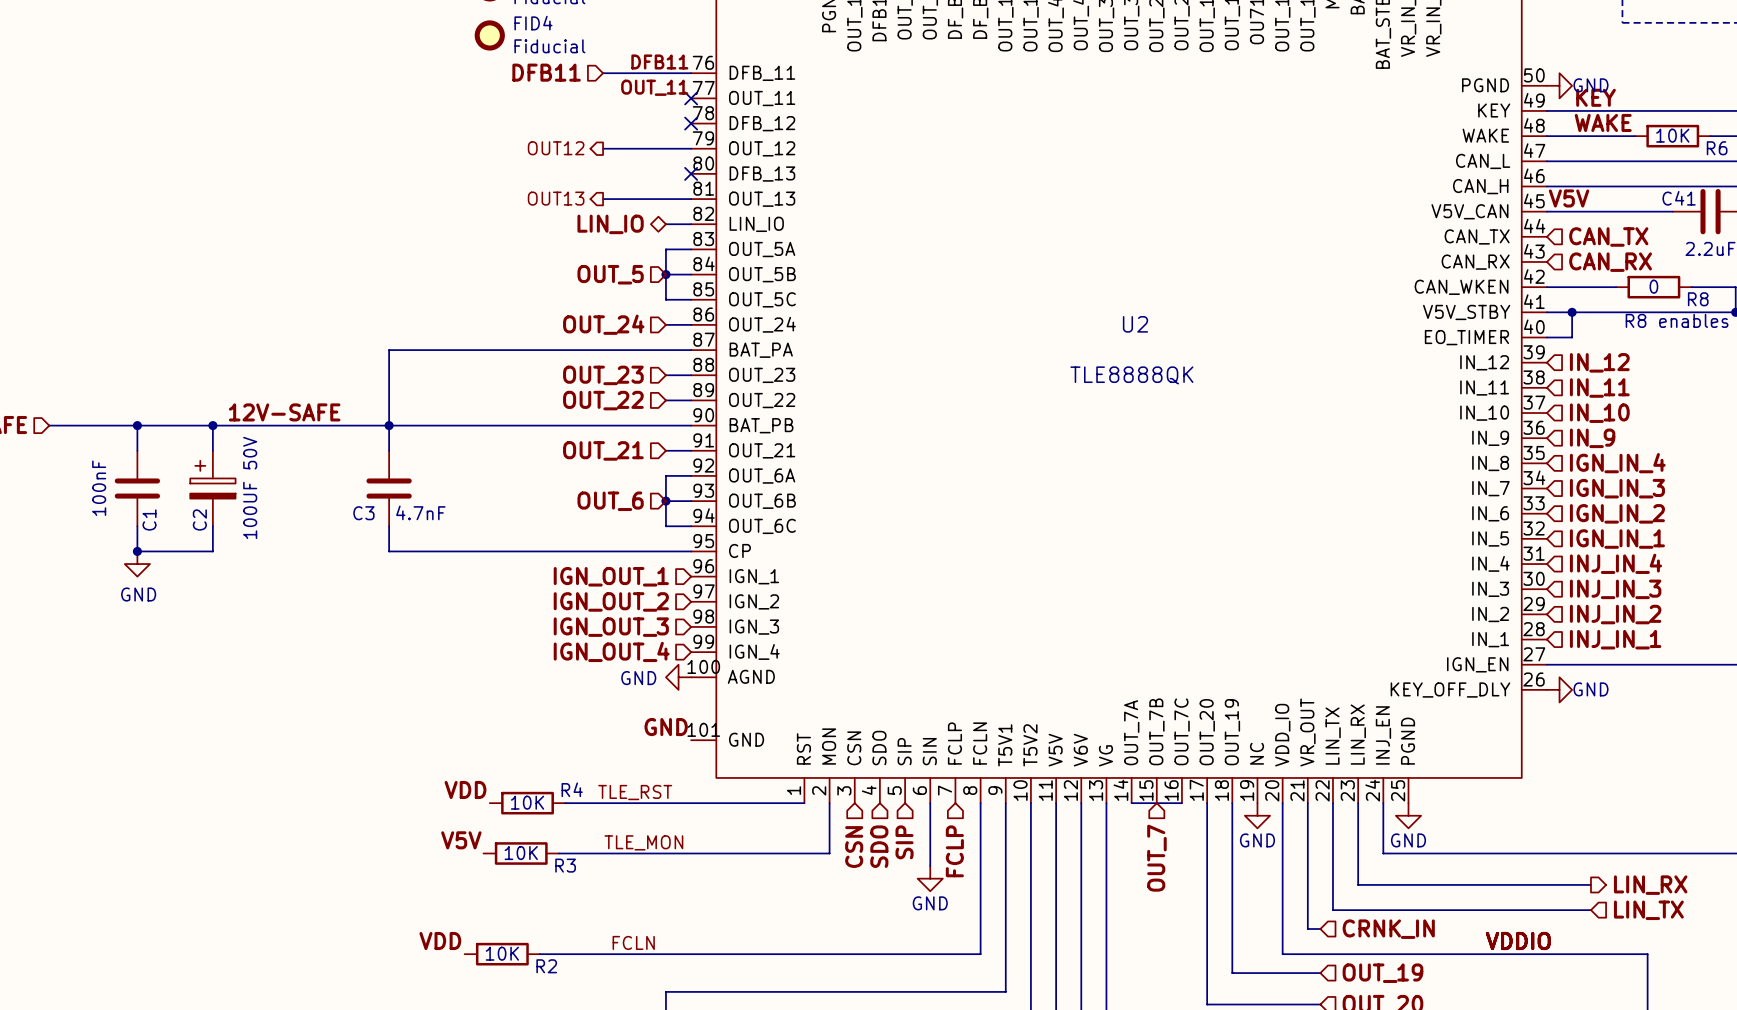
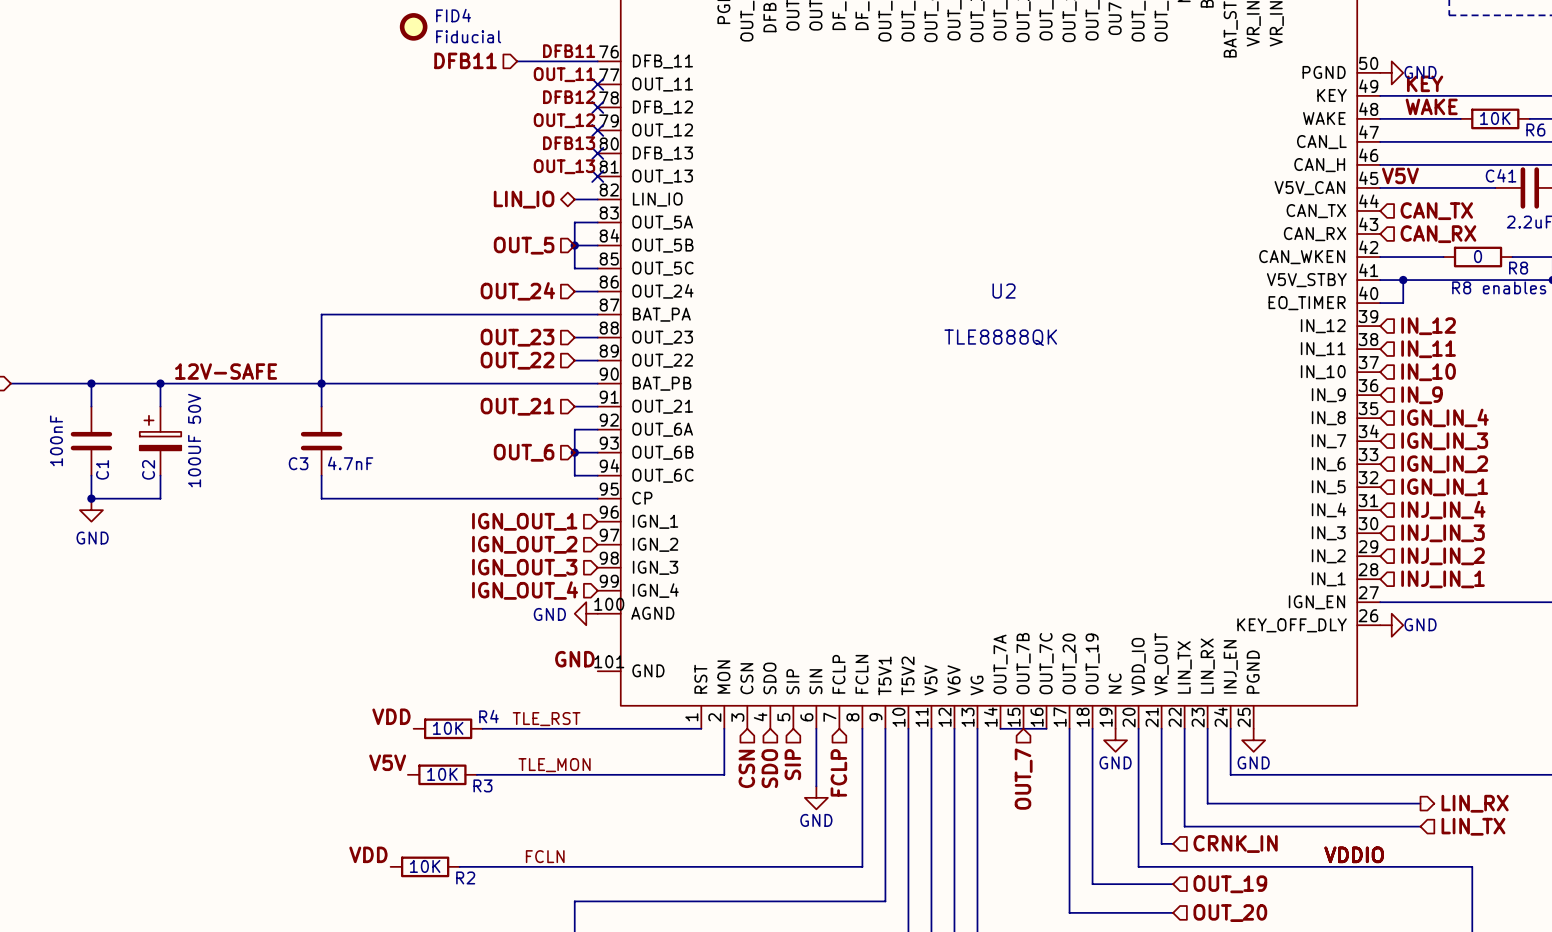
label: none -> DFB12 (569, 97)
label: none -> OUT_12 (564, 120)
hierarchical label: OUT12 (556, 148) -> none
wire: (603, 148) (691, 148) -> none
no-connect mark: none -> (597, 130)
label: none -> DFB13 (569, 143)
label: none -> OUT_13 (564, 166)
hierarchical label: OUT13 (556, 198) -> none
wire: (603, 199) (691, 199) -> none
no-connect mark: none -> (597, 176)

